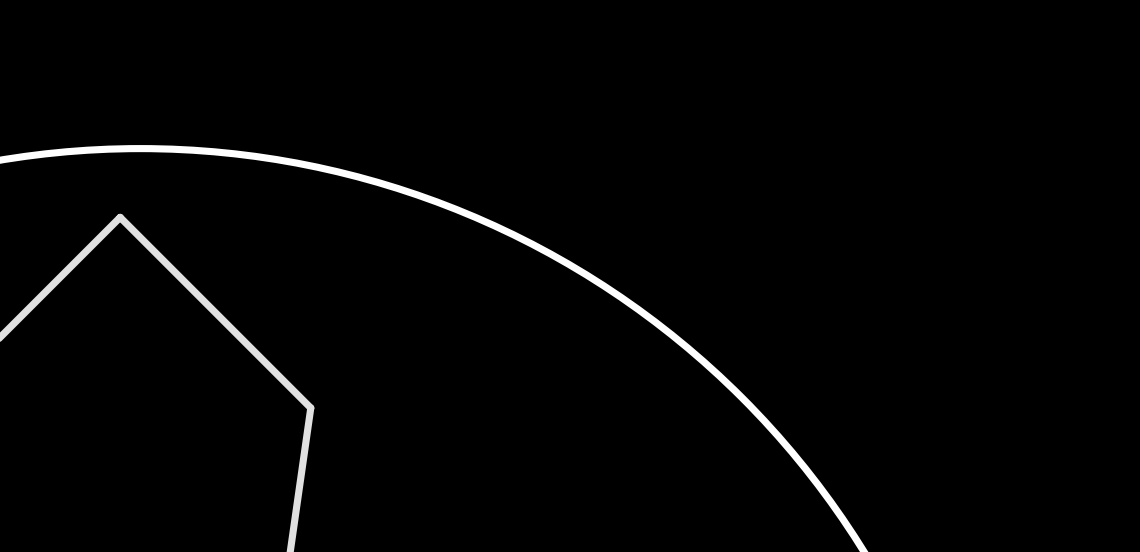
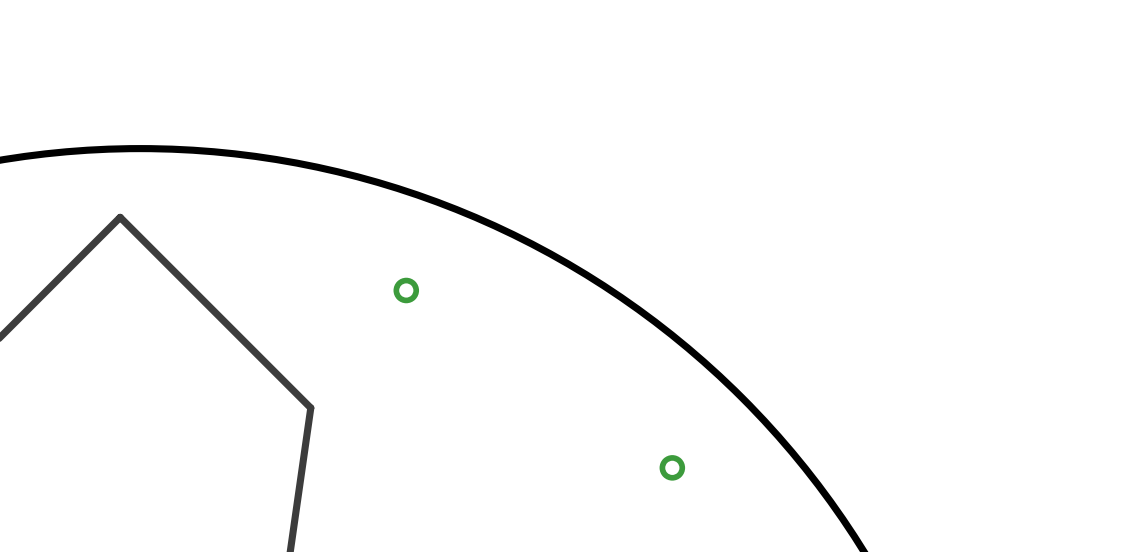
via: none -> (406, 290)
via: none -> (672, 467)

